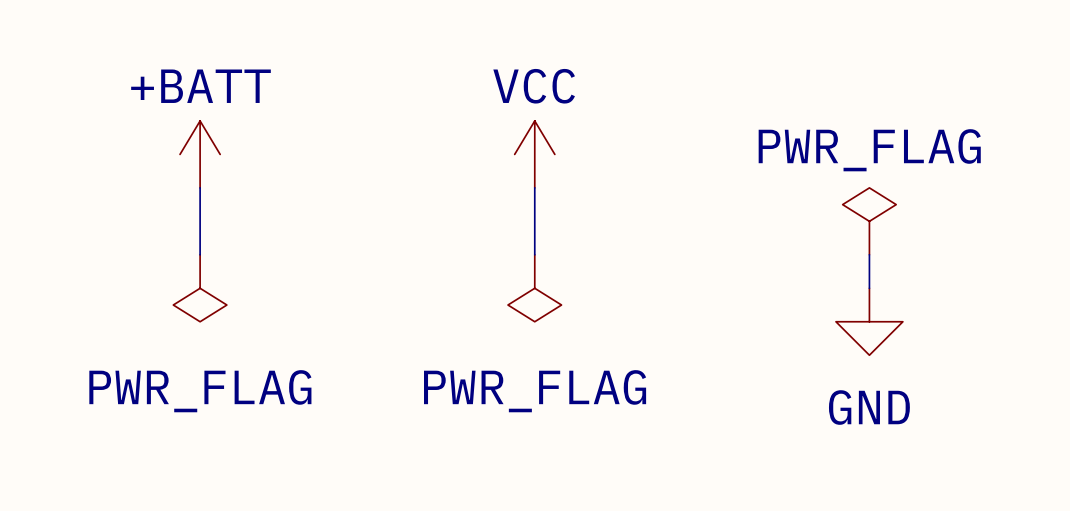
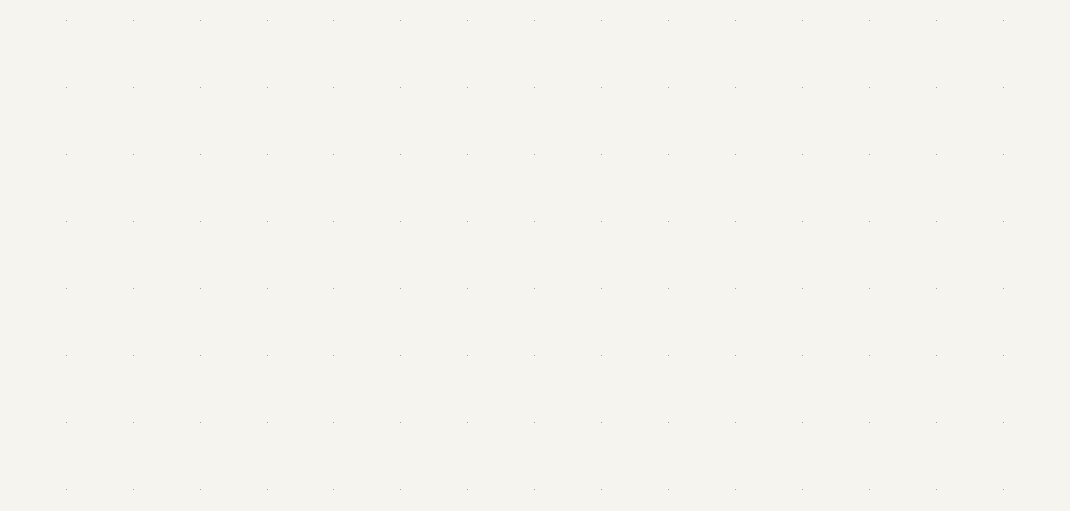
power symbol: +BATT (200, 154) -> none
power symbol: VCC (534, 154) -> none
wire: (200, 187) (200, 254) -> none
wire: (534, 187) (534, 254) -> none
power symbol: PWR_FLAG (869, 221) -> none
wire: (869, 254) (869, 288) -> none
power symbol: PWR_FLAG (200, 288) -> none
power symbol: PWR_FLAG (534, 288) -> none
power symbol: GND (869, 321) -> none

